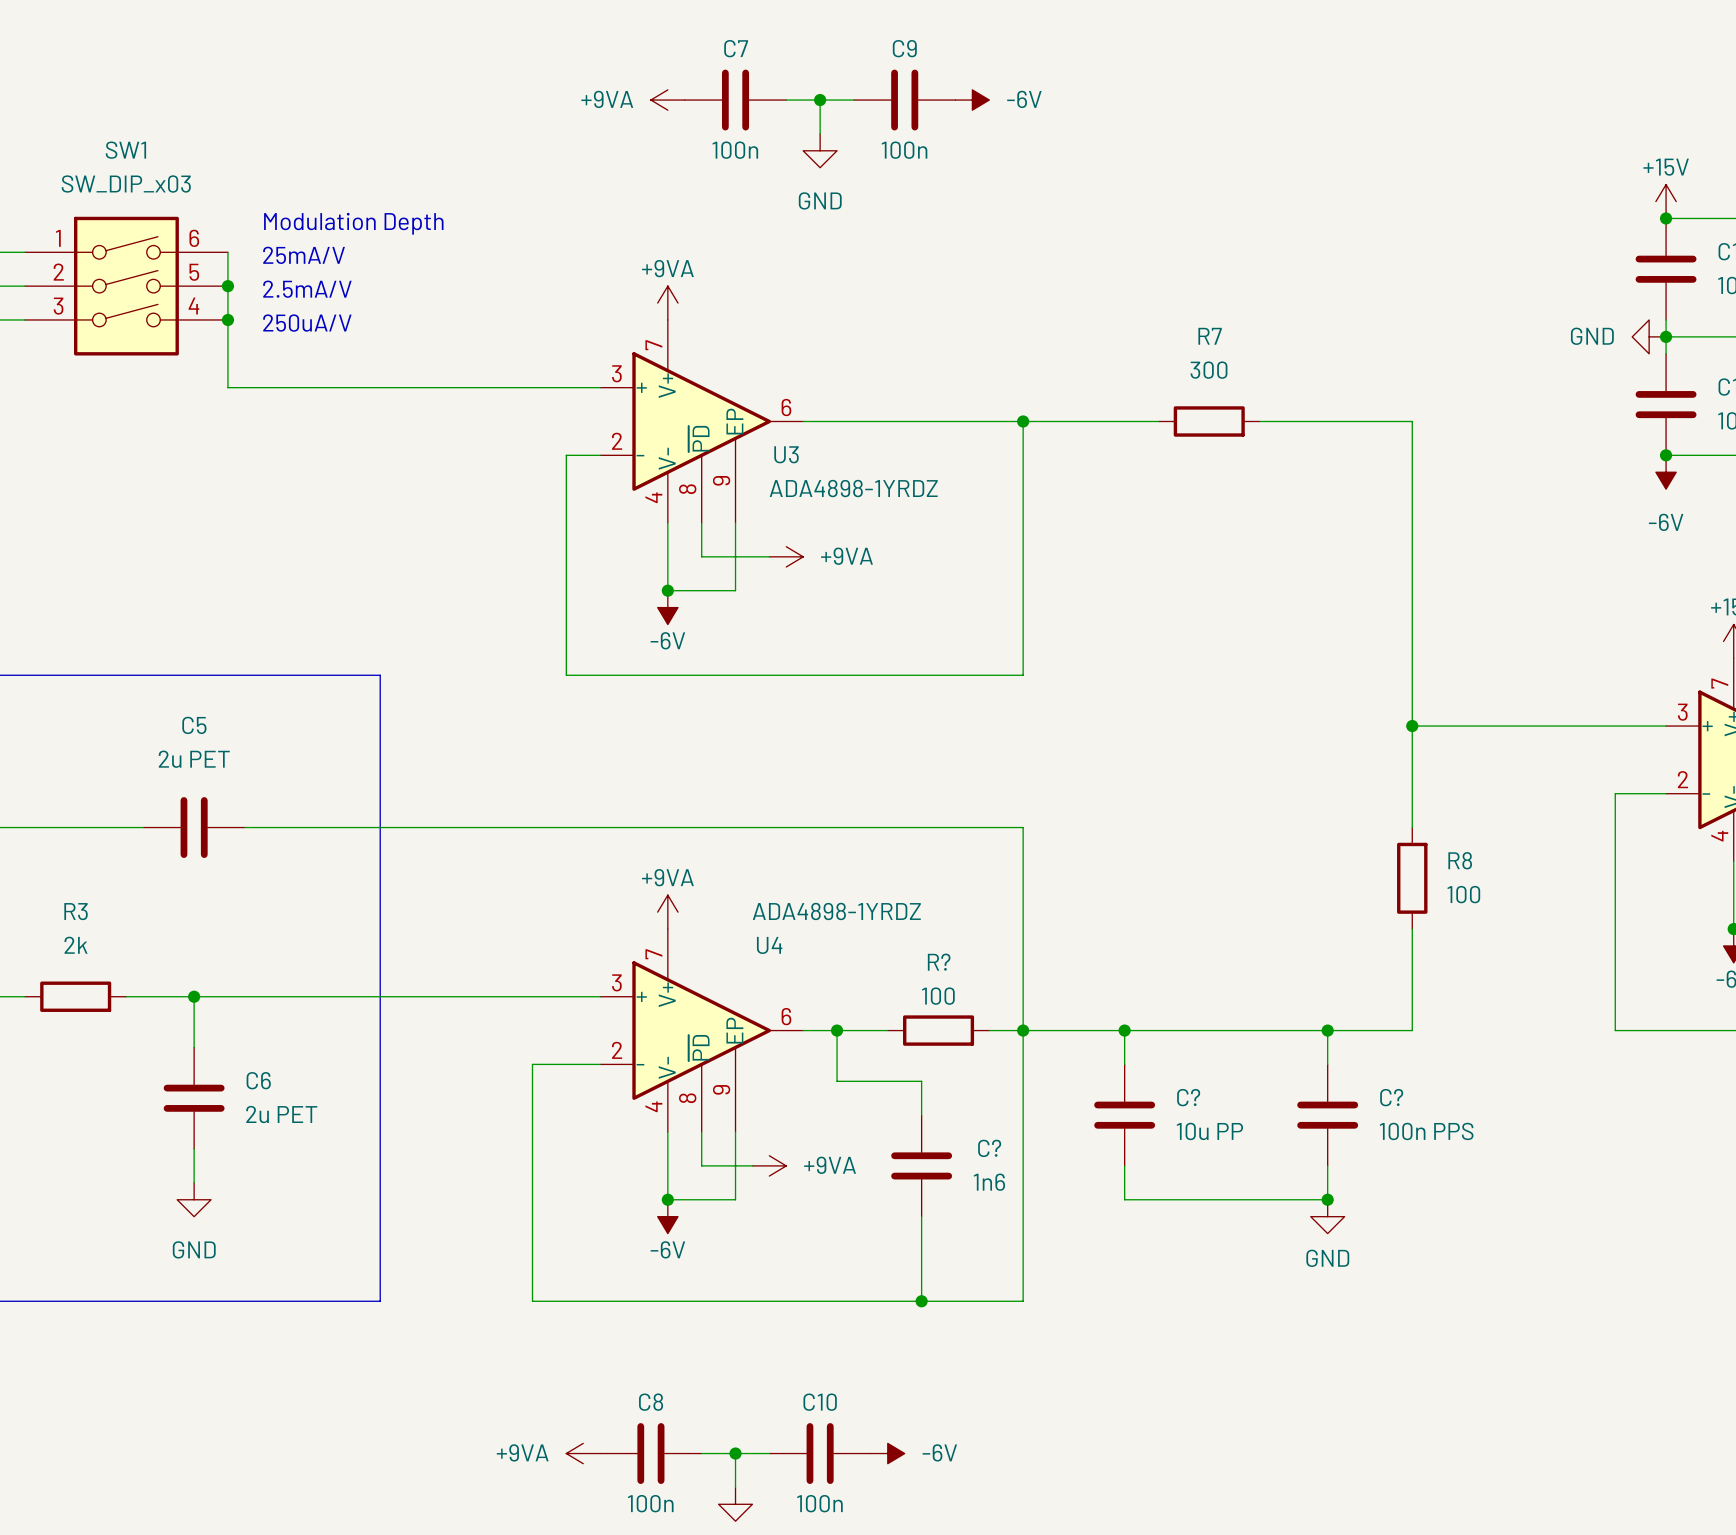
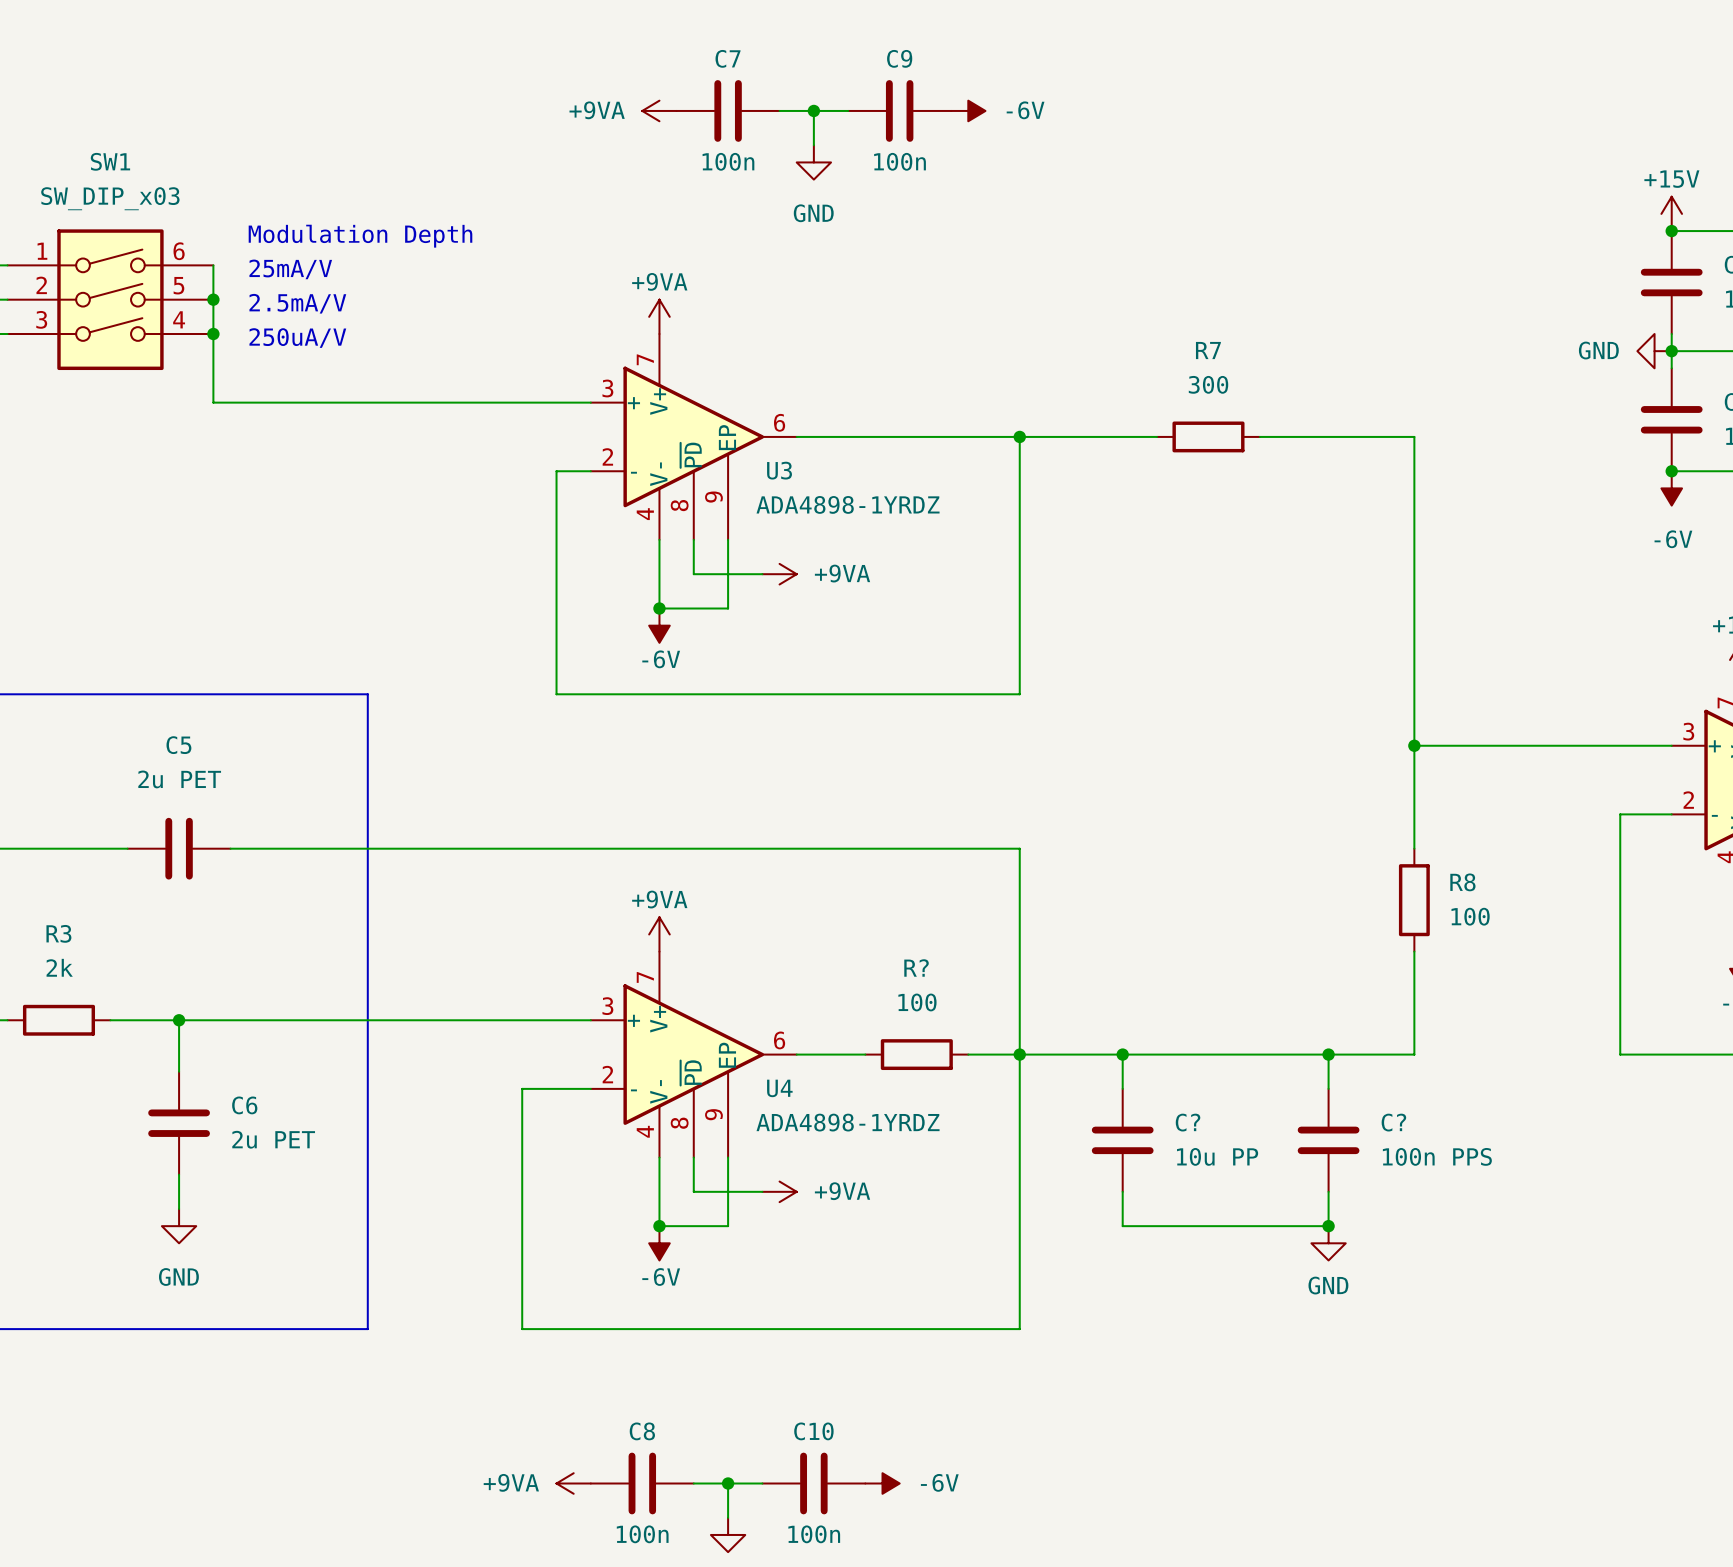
U4 value position: ADA4898-1YRDZ (836, 911) -> ADA4898-1YRDZ (848, 1122)
U4 name position: U4 (769, 945) -> U4 (779, 1088)
R? name position: R? (939, 962) -> R? (916, 968)
R? value position: 100 (938, 996) -> 100 (917, 1002)
wire: (837, 1030) (837, 1081) (921, 1081) (921, 1115) -> none
junction: (837, 1030) -> none
R? position: (938, 1030) -> (916, 1054)
power symbol position: +9VA (769, 1165) -> +9VA (779, 1191)
C?: 1n6 (921, 1165) -> none
wire: (921, 1216) (921, 1301) -> none
junction: (921, 1301) -> none

